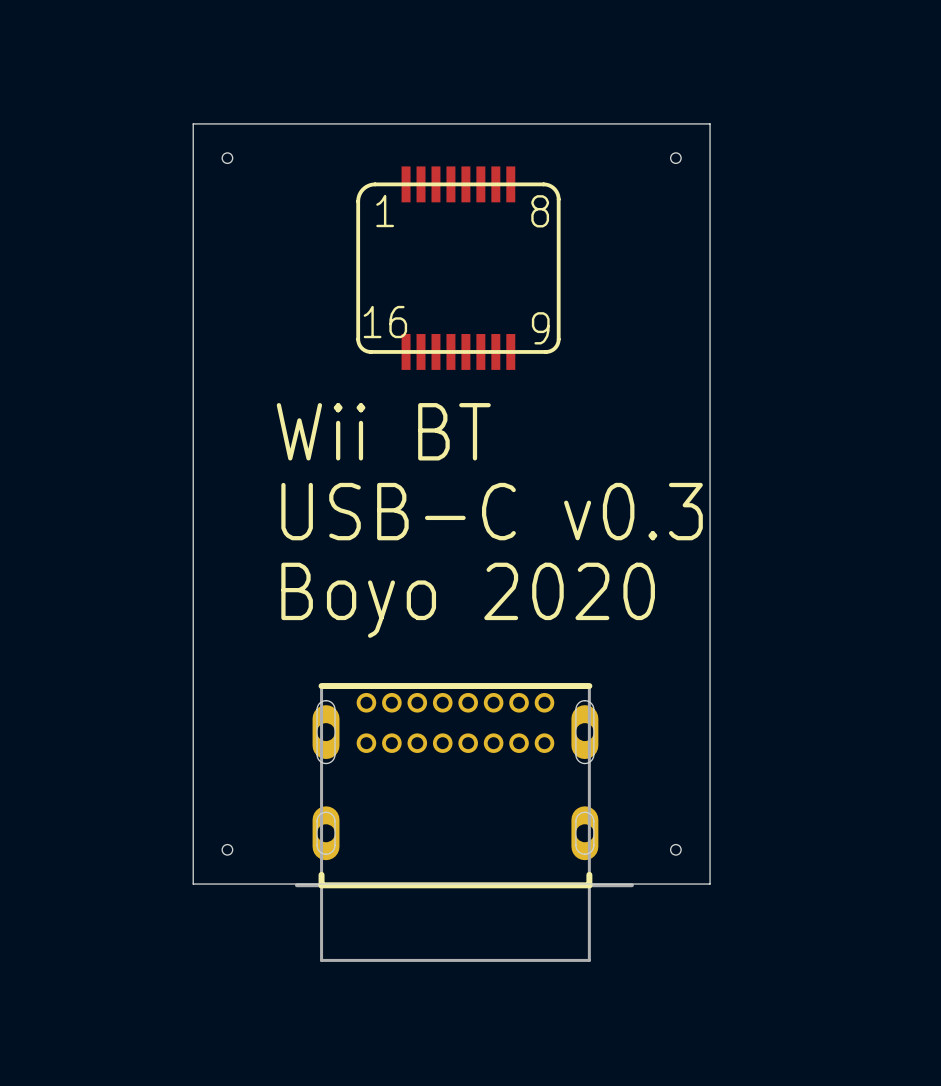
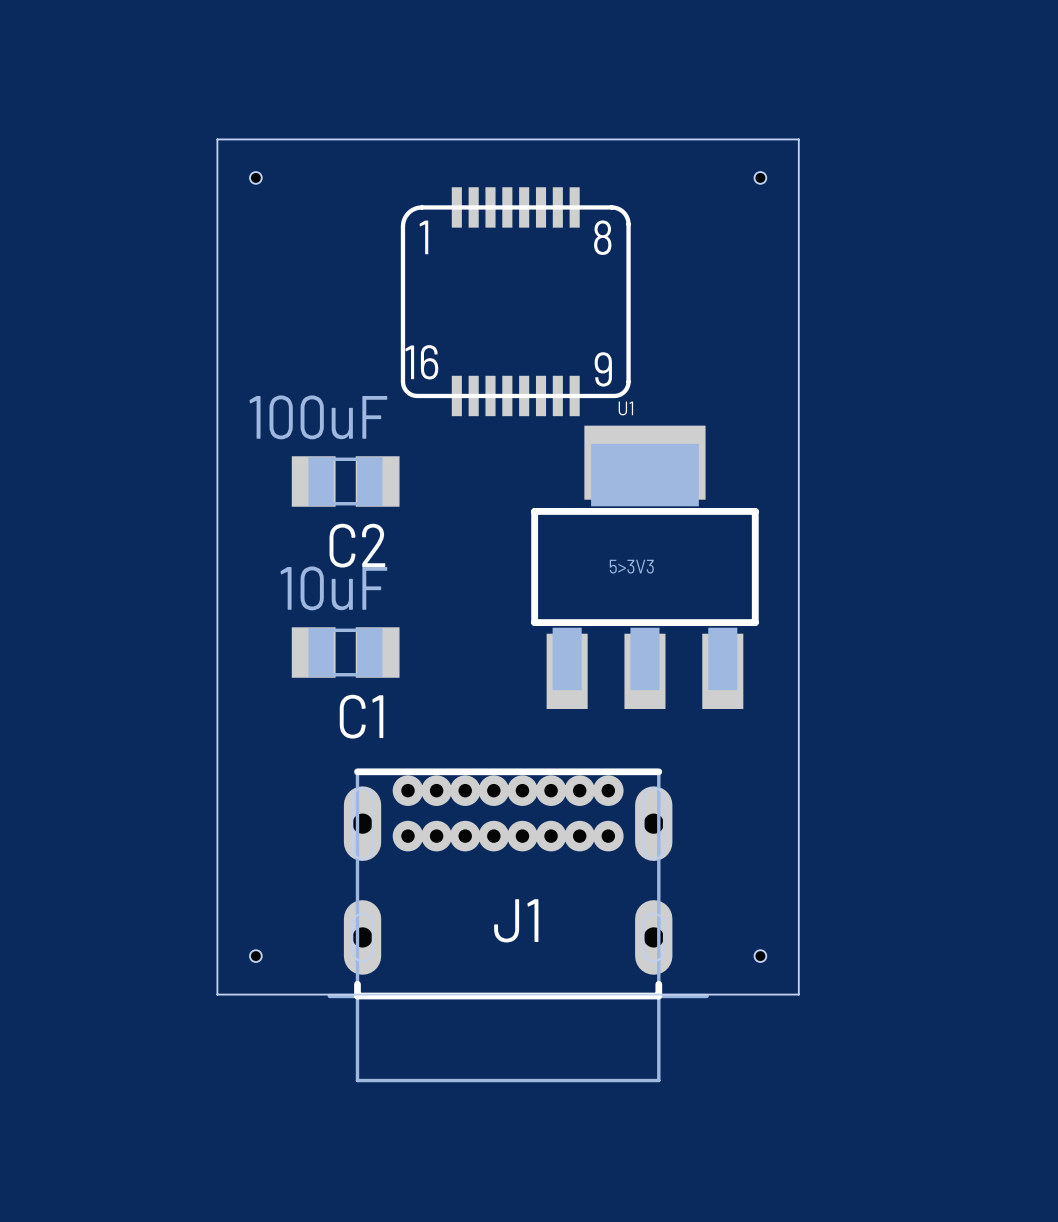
C2: none -> 100uF (345, 481)
text: Wii BT (383, 431) -> none
U1: none -> 5>3V3 (644, 567)
text: USB-C v0.3 (492, 511) -> none
C1: none -> 10uF (345, 652)
text: Boyo 2020 (468, 600) -> none
J1: none -> (518, 925)
part: (464, 822) -> none

